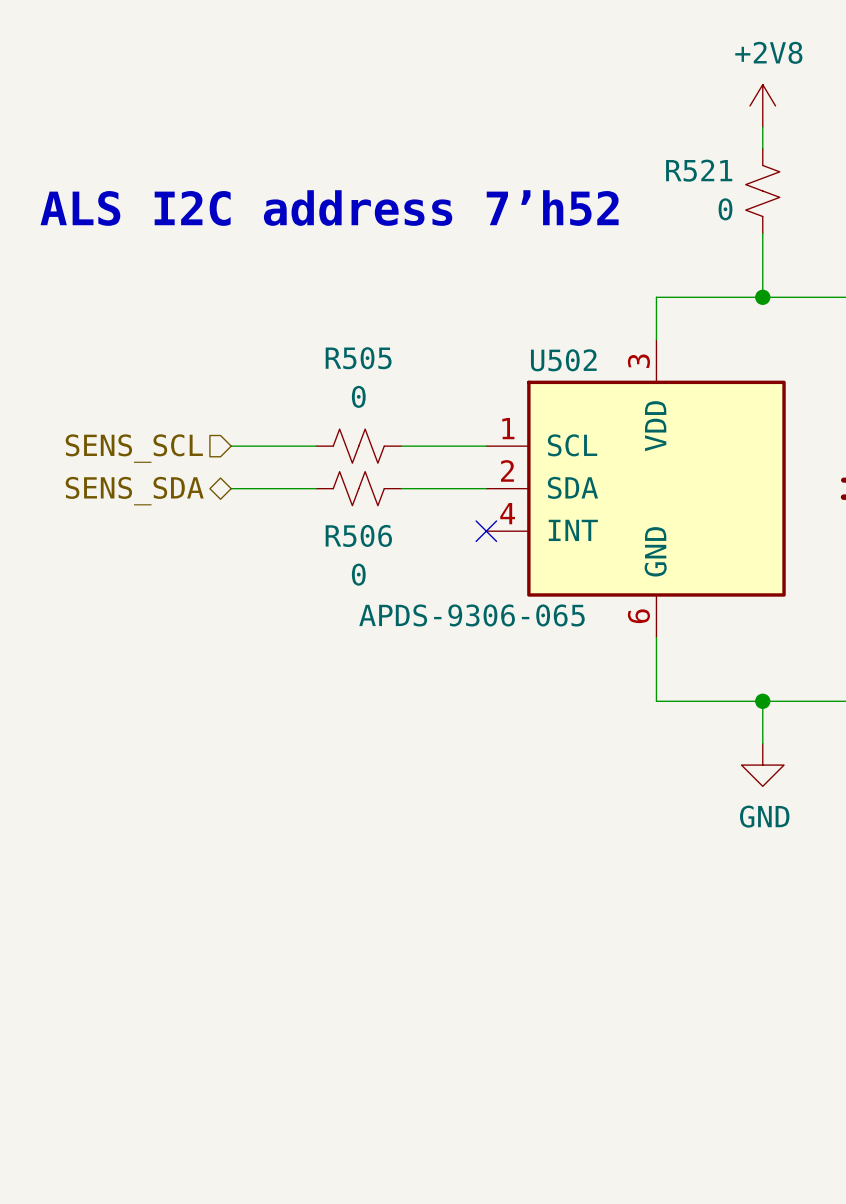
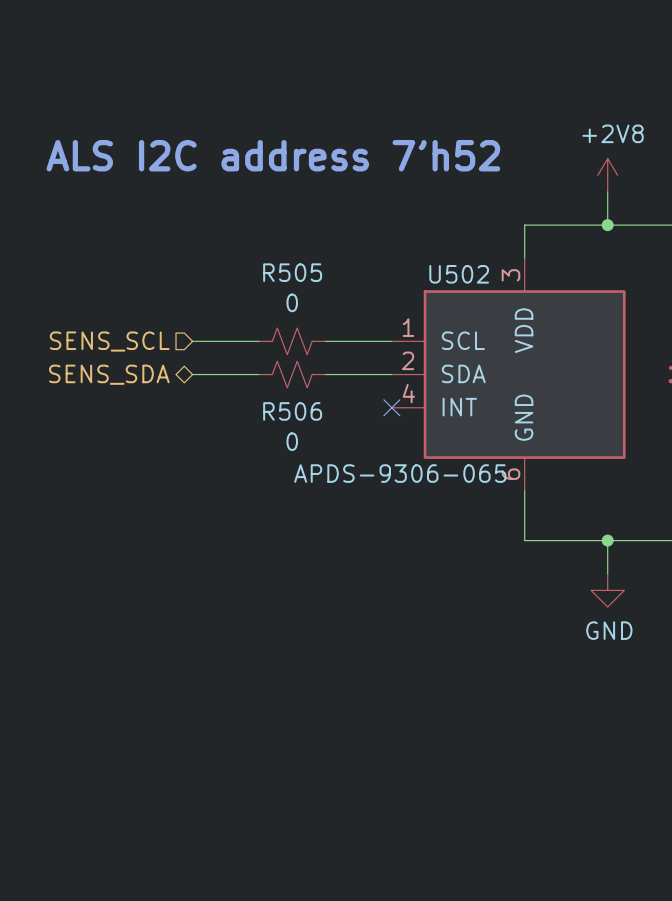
power symbol position: +2V8 (762, 105) -> +2V8 (607, 175)
wire: (762, 127) (762, 148) -> none
R521: 0 (762, 190) -> none

